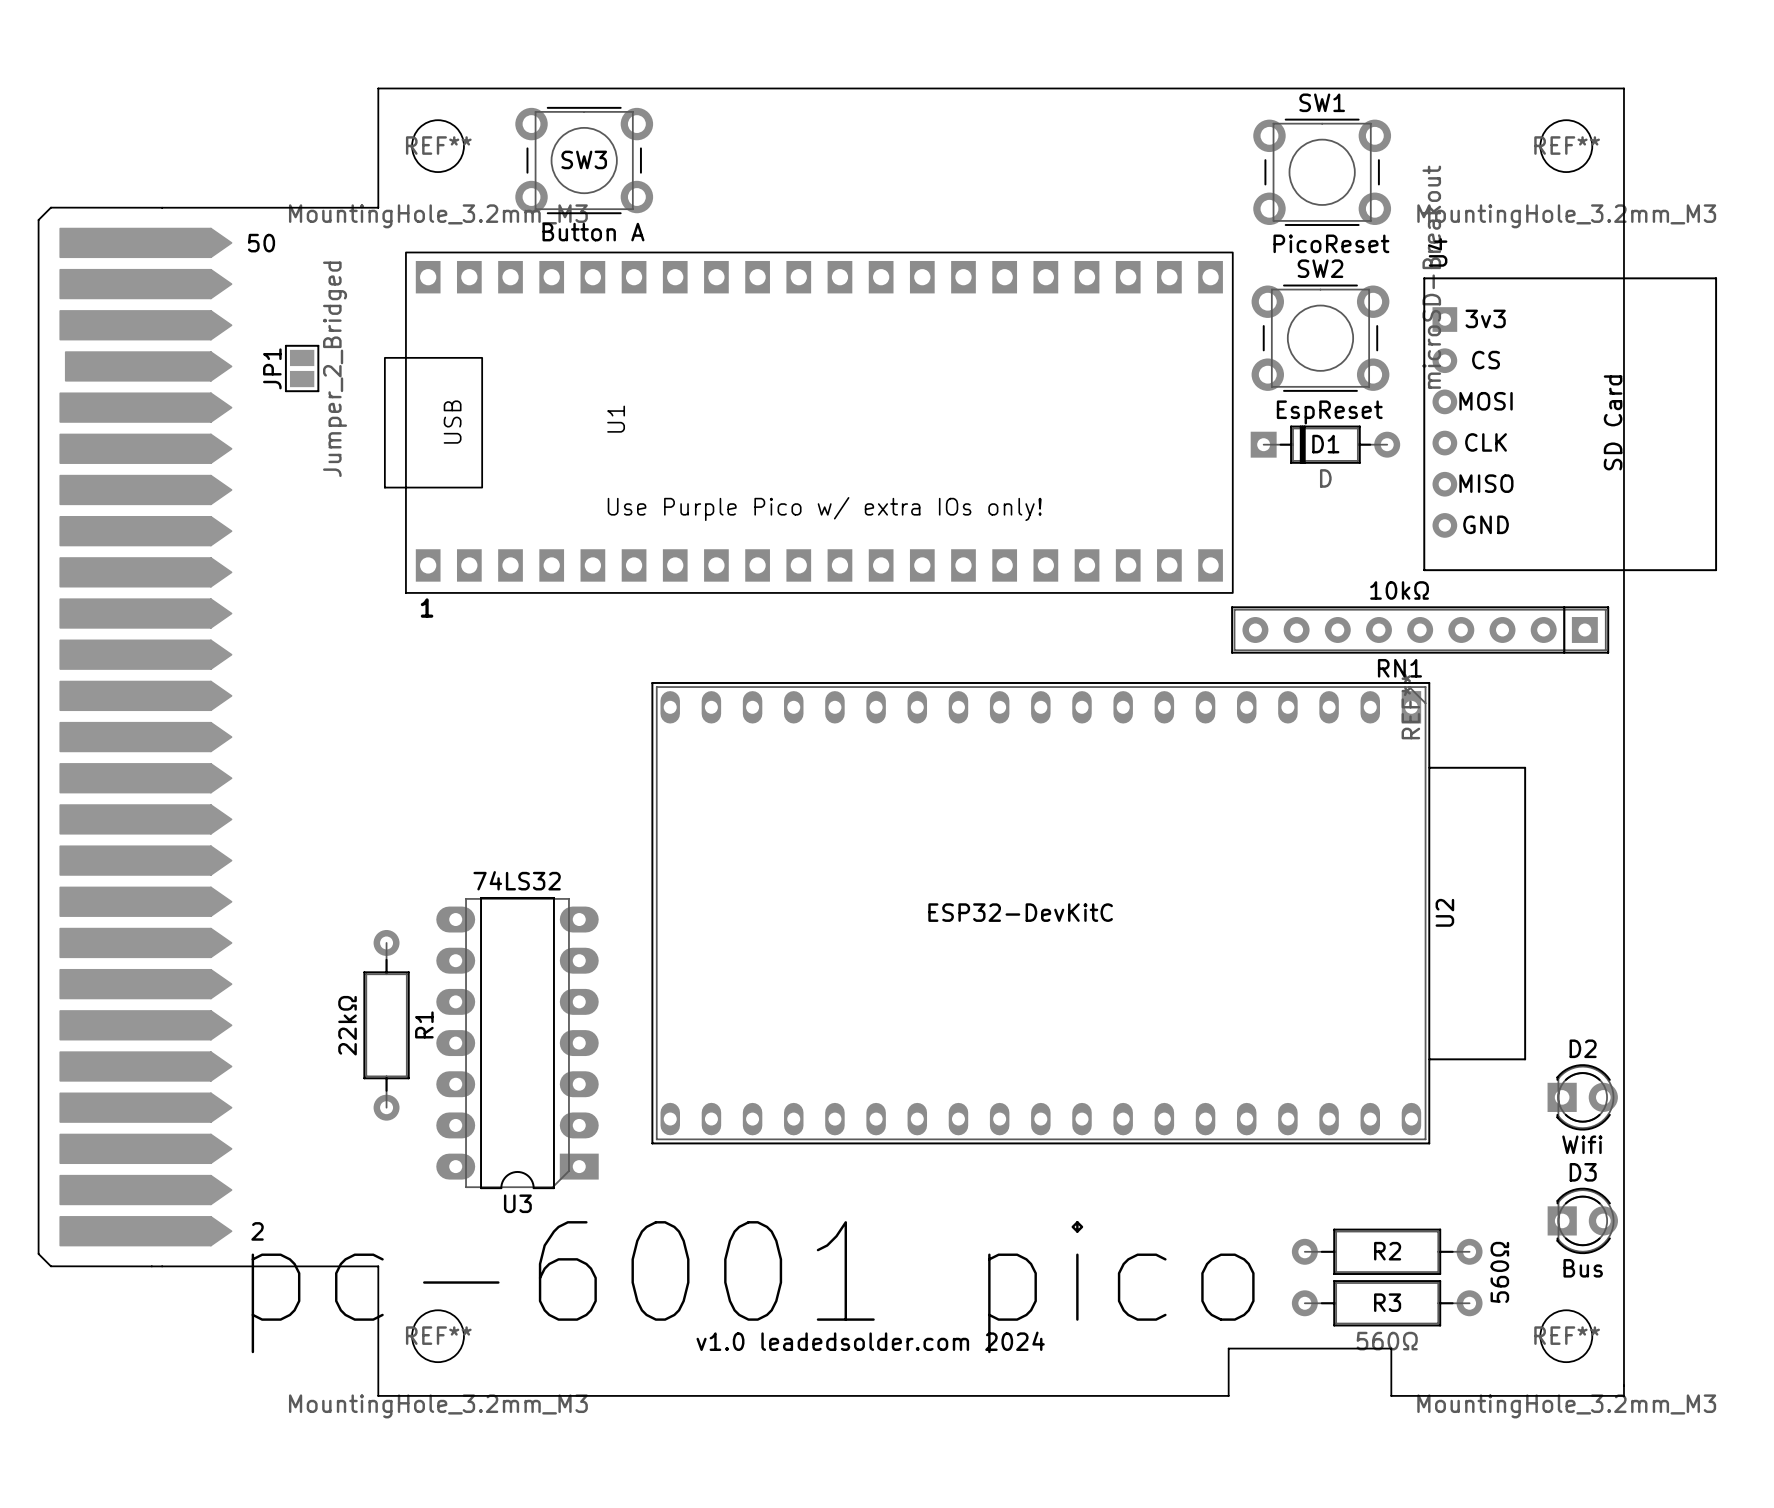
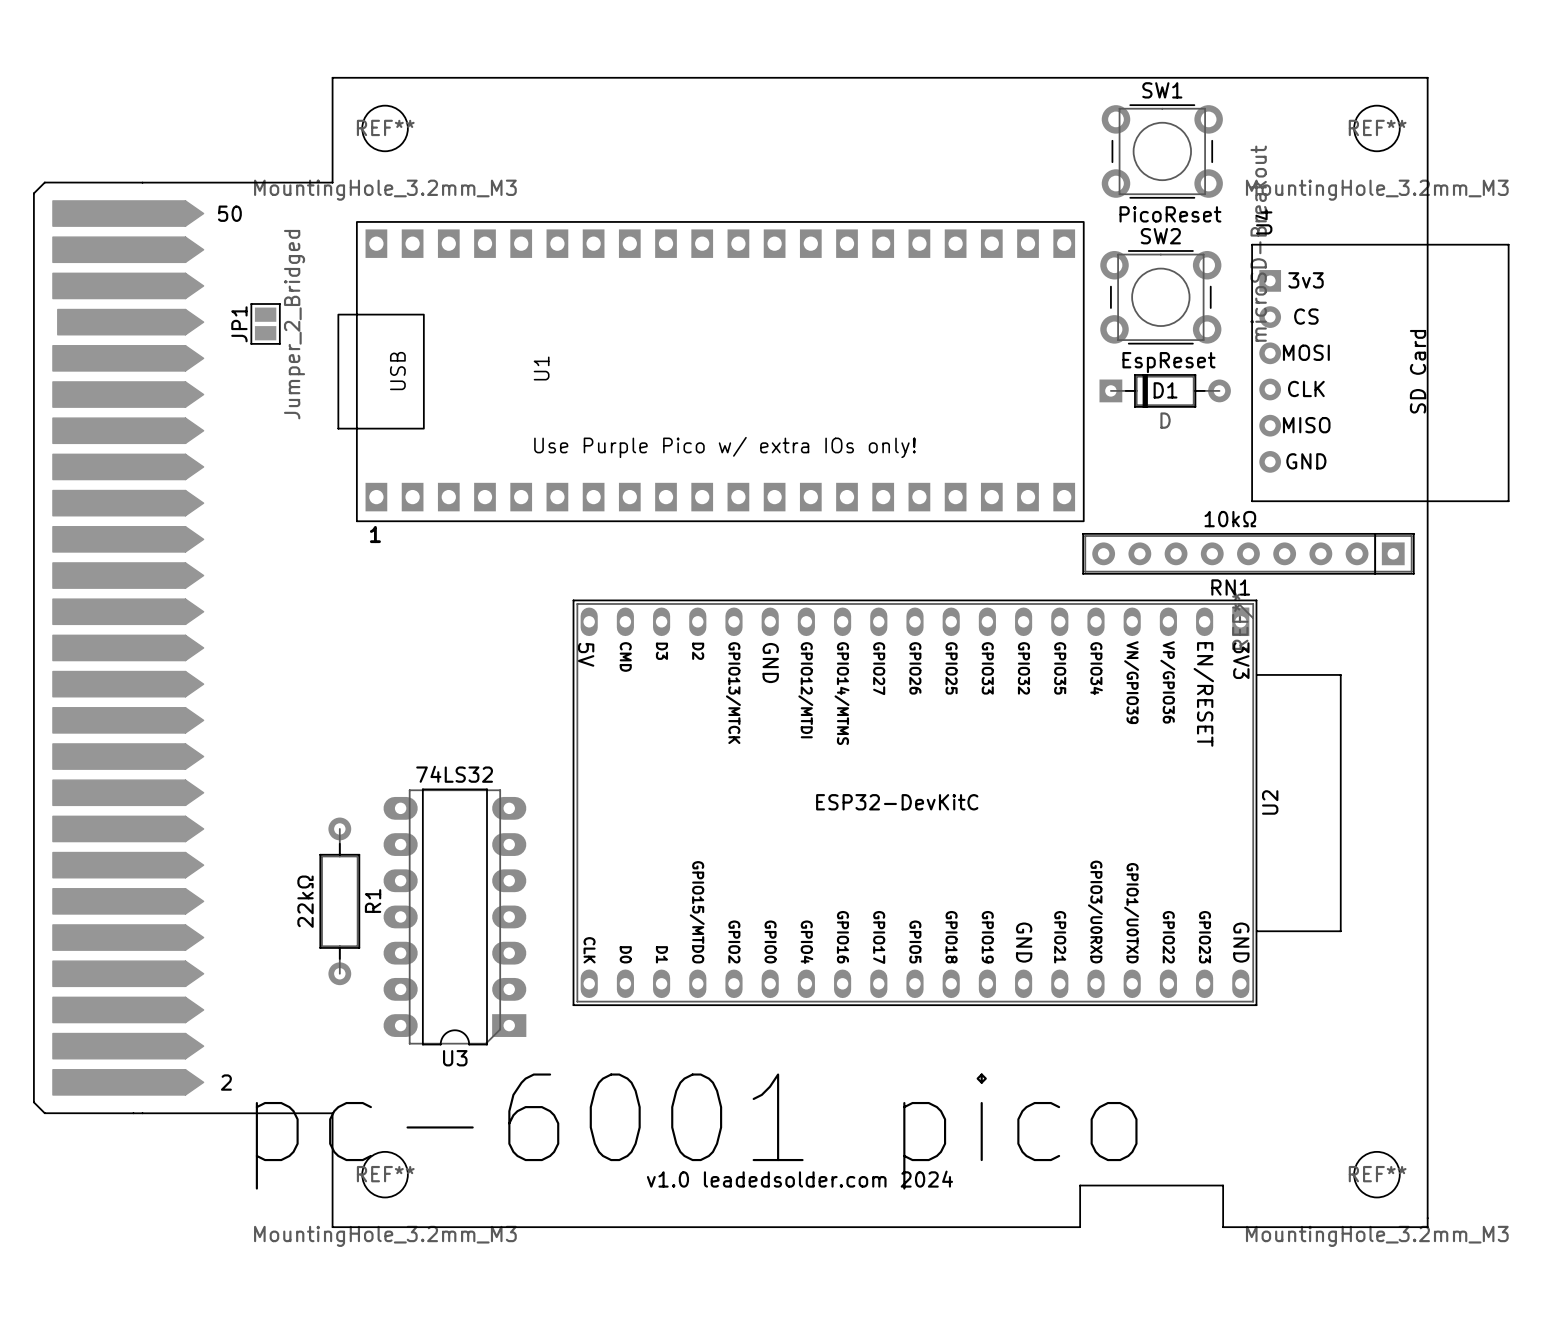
SW3: Button A (584, 160) -> none
U2 footprint: [651, 682, 1527, 1145] -> [572, 599, 1342, 1007]
D2: Wifi (1582, 1097) -> none
D3: Bus (1582, 1220) -> none
R2: 560Ω (1387, 1251) -> none
text position: pc-6001 pico (753, 1287) -> pc-6001 pico (696, 1131)
R3: 560Ω (1387, 1303) -> none
text position: v1.0 leadedsolder.com 2024 (870, 1341) -> v1.0 leadedsolder.com 2024 (799, 1179)

